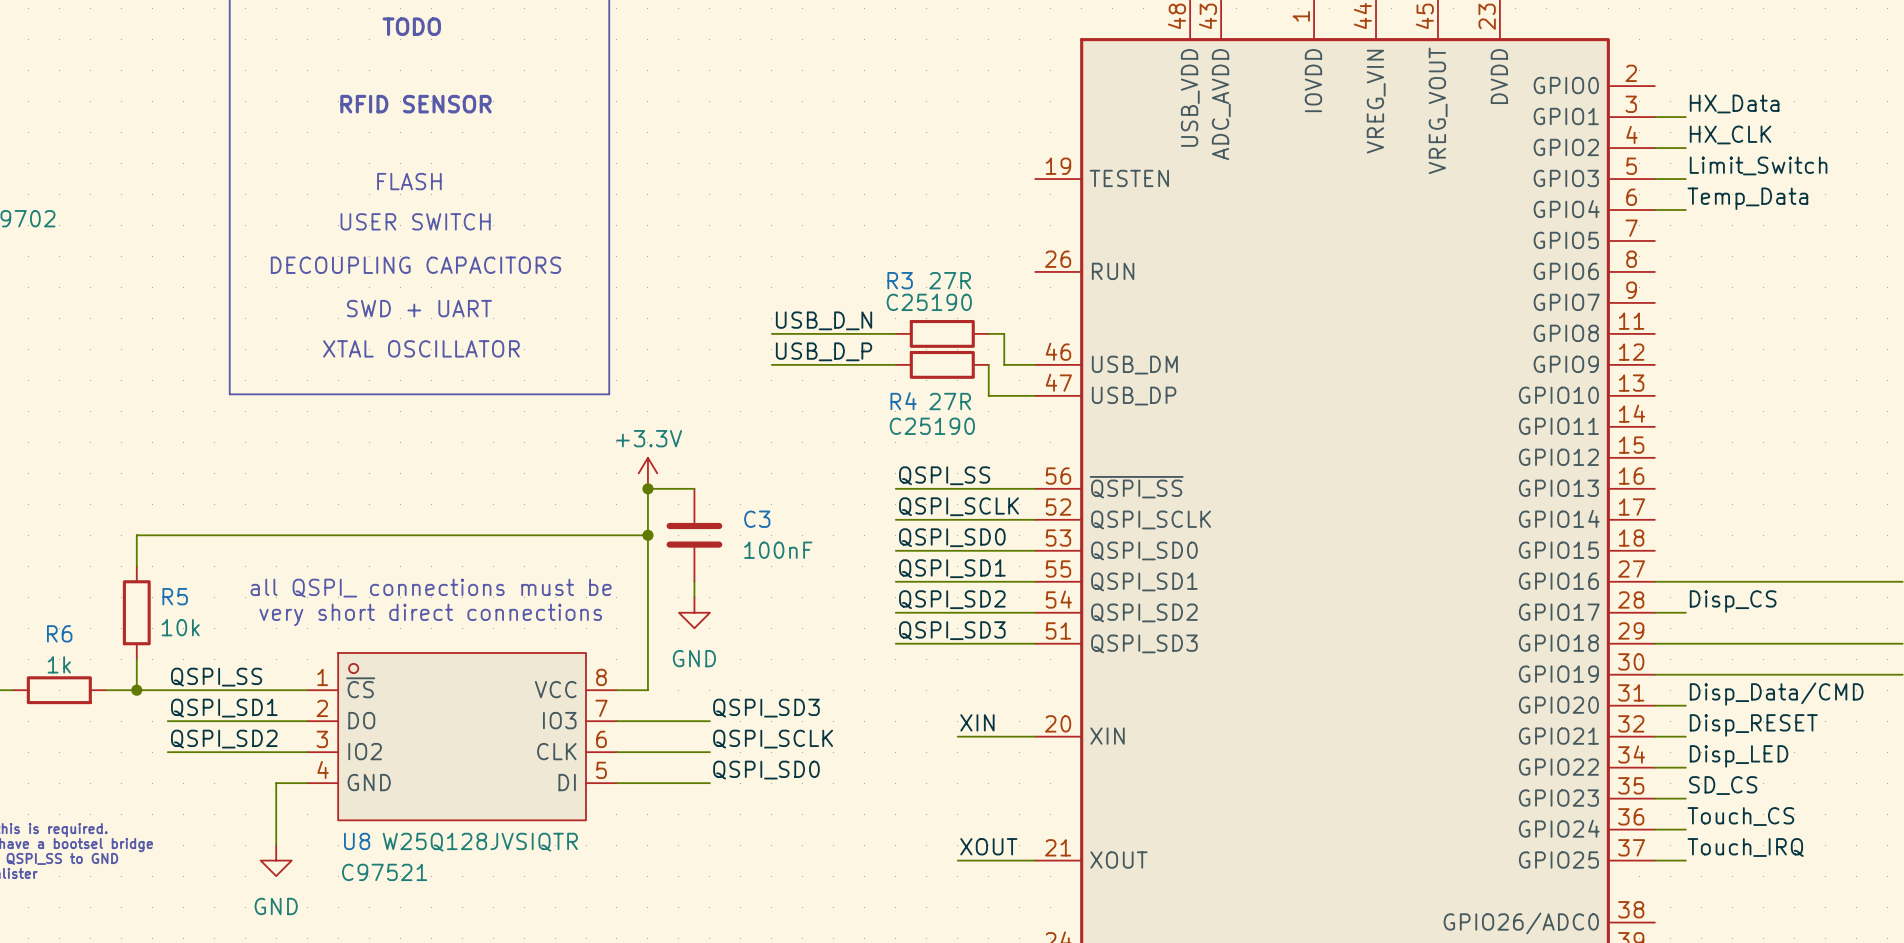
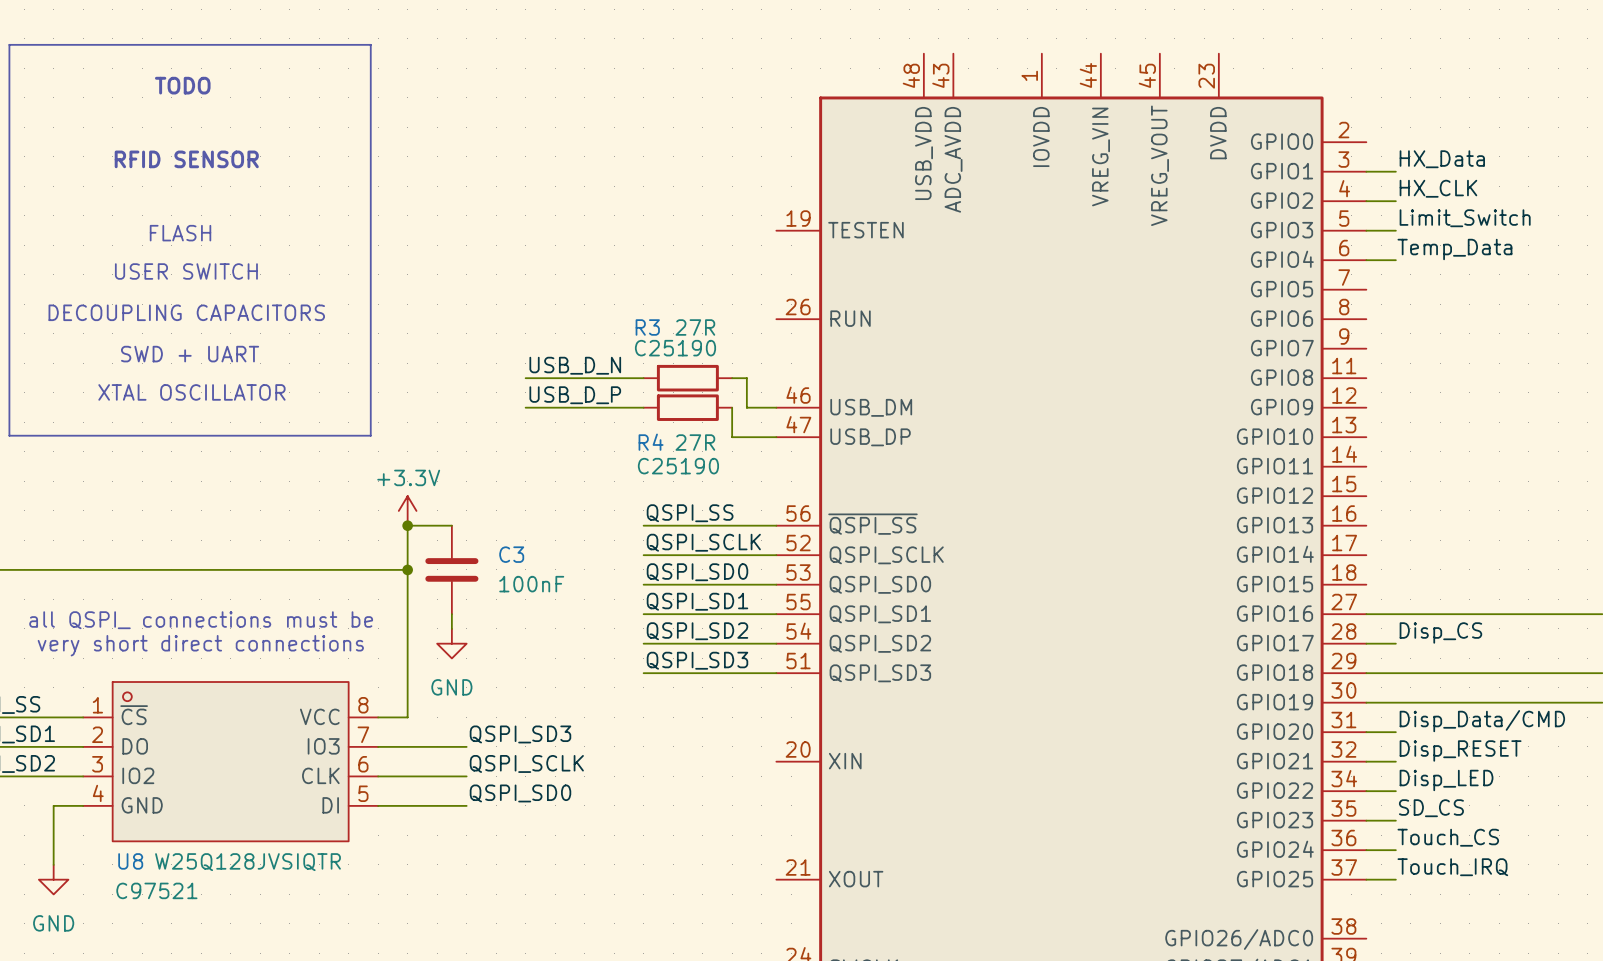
label: XIN (977, 722) -> none
wire: (957, 736) (1035, 736) -> none
label: XOUT (988, 846) -> none
wire: (957, 860) (1035, 860) -> none

